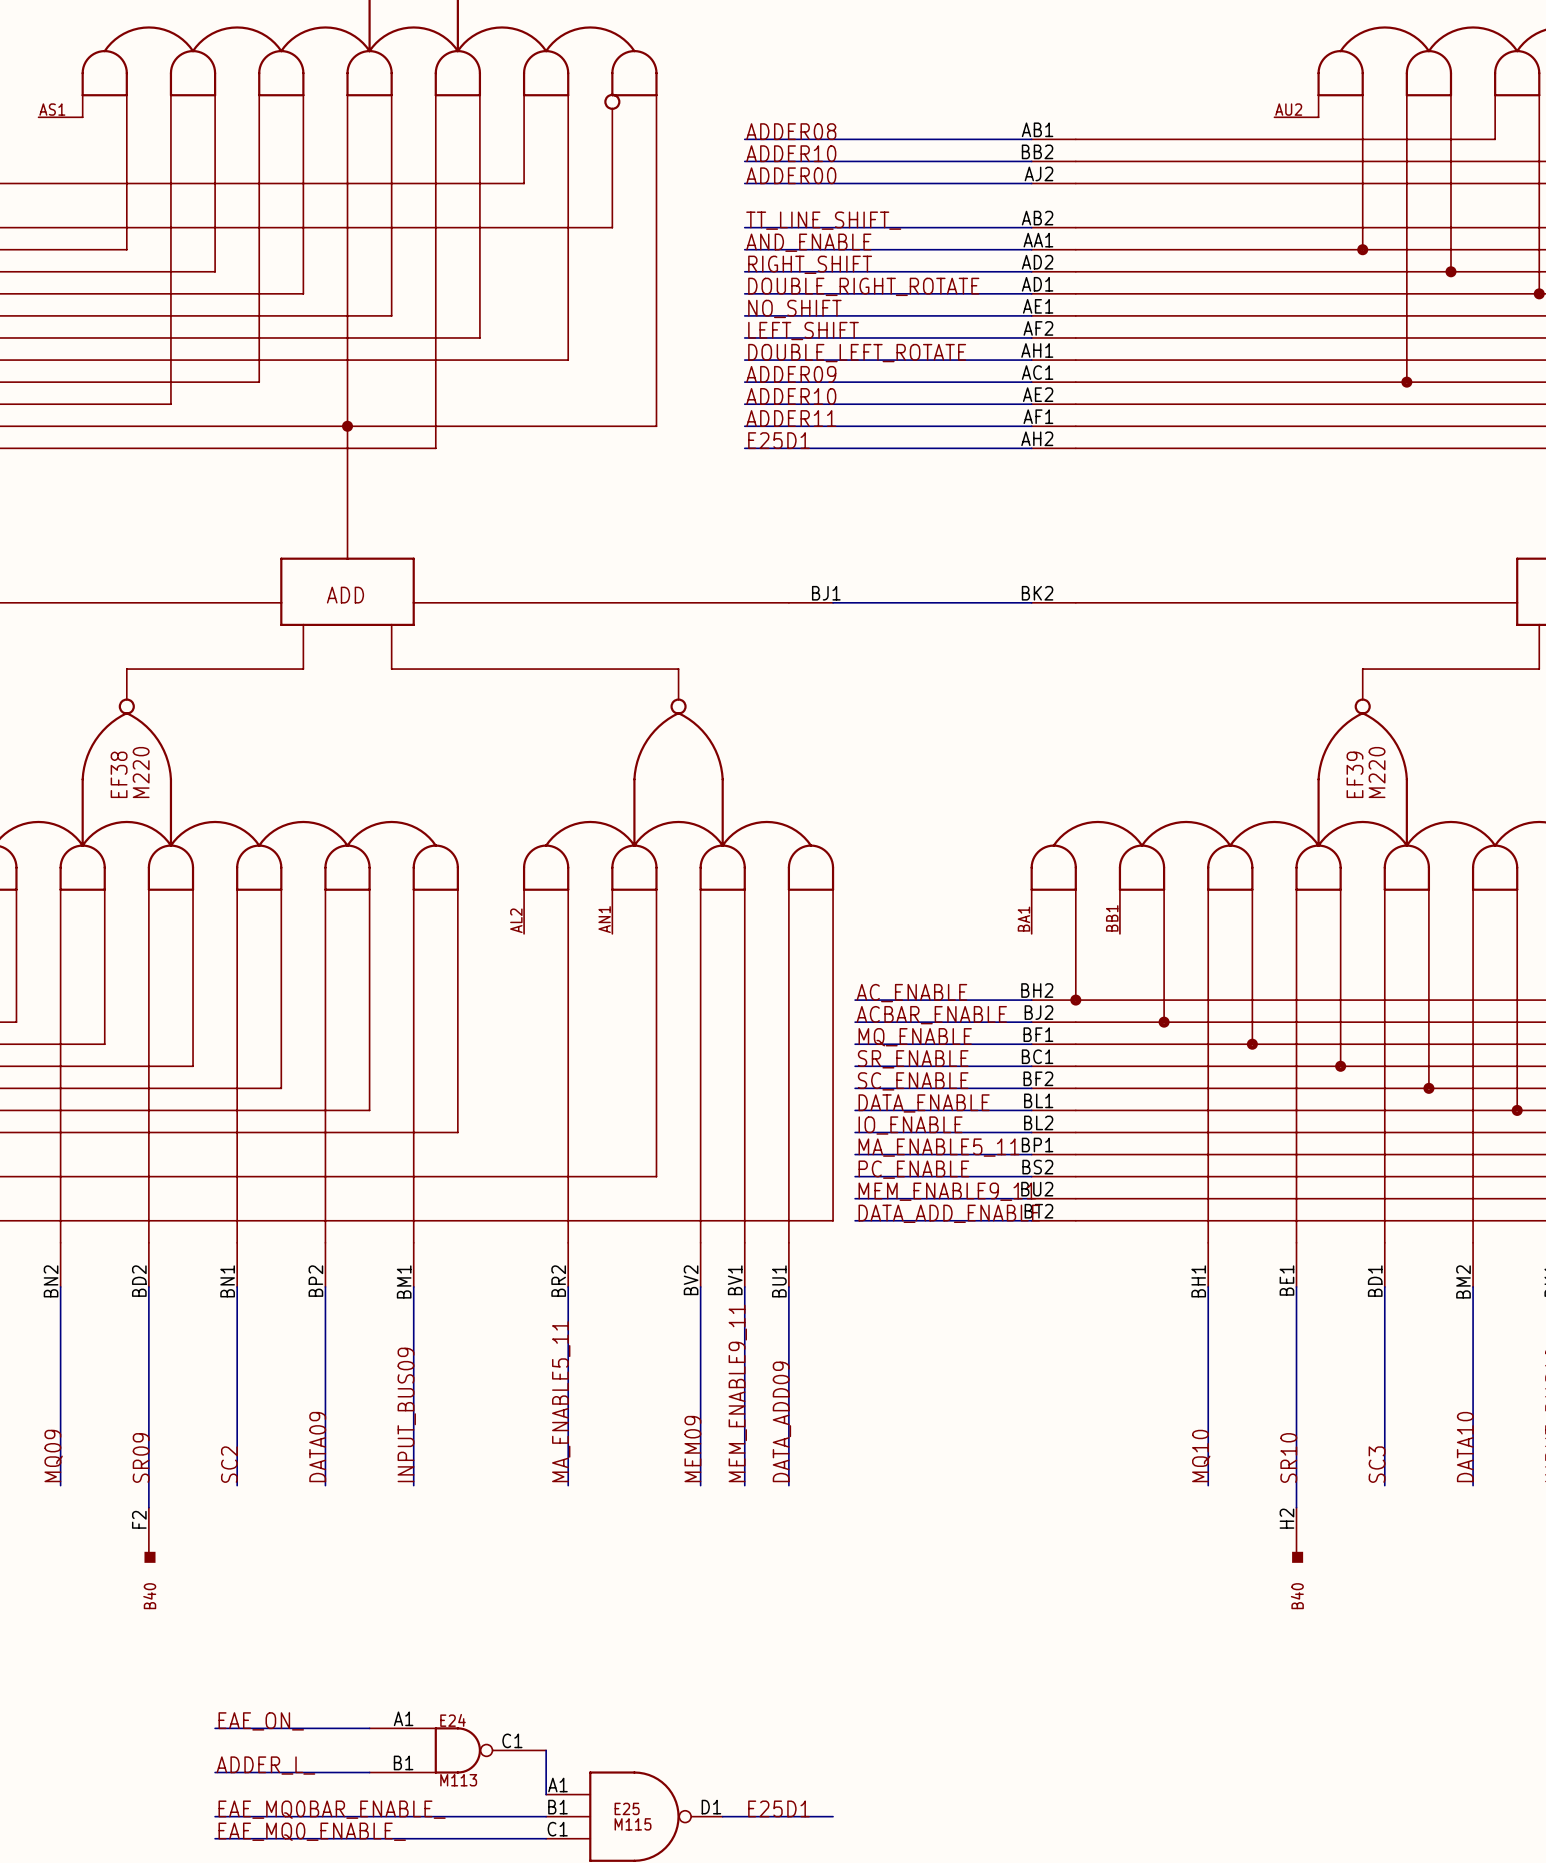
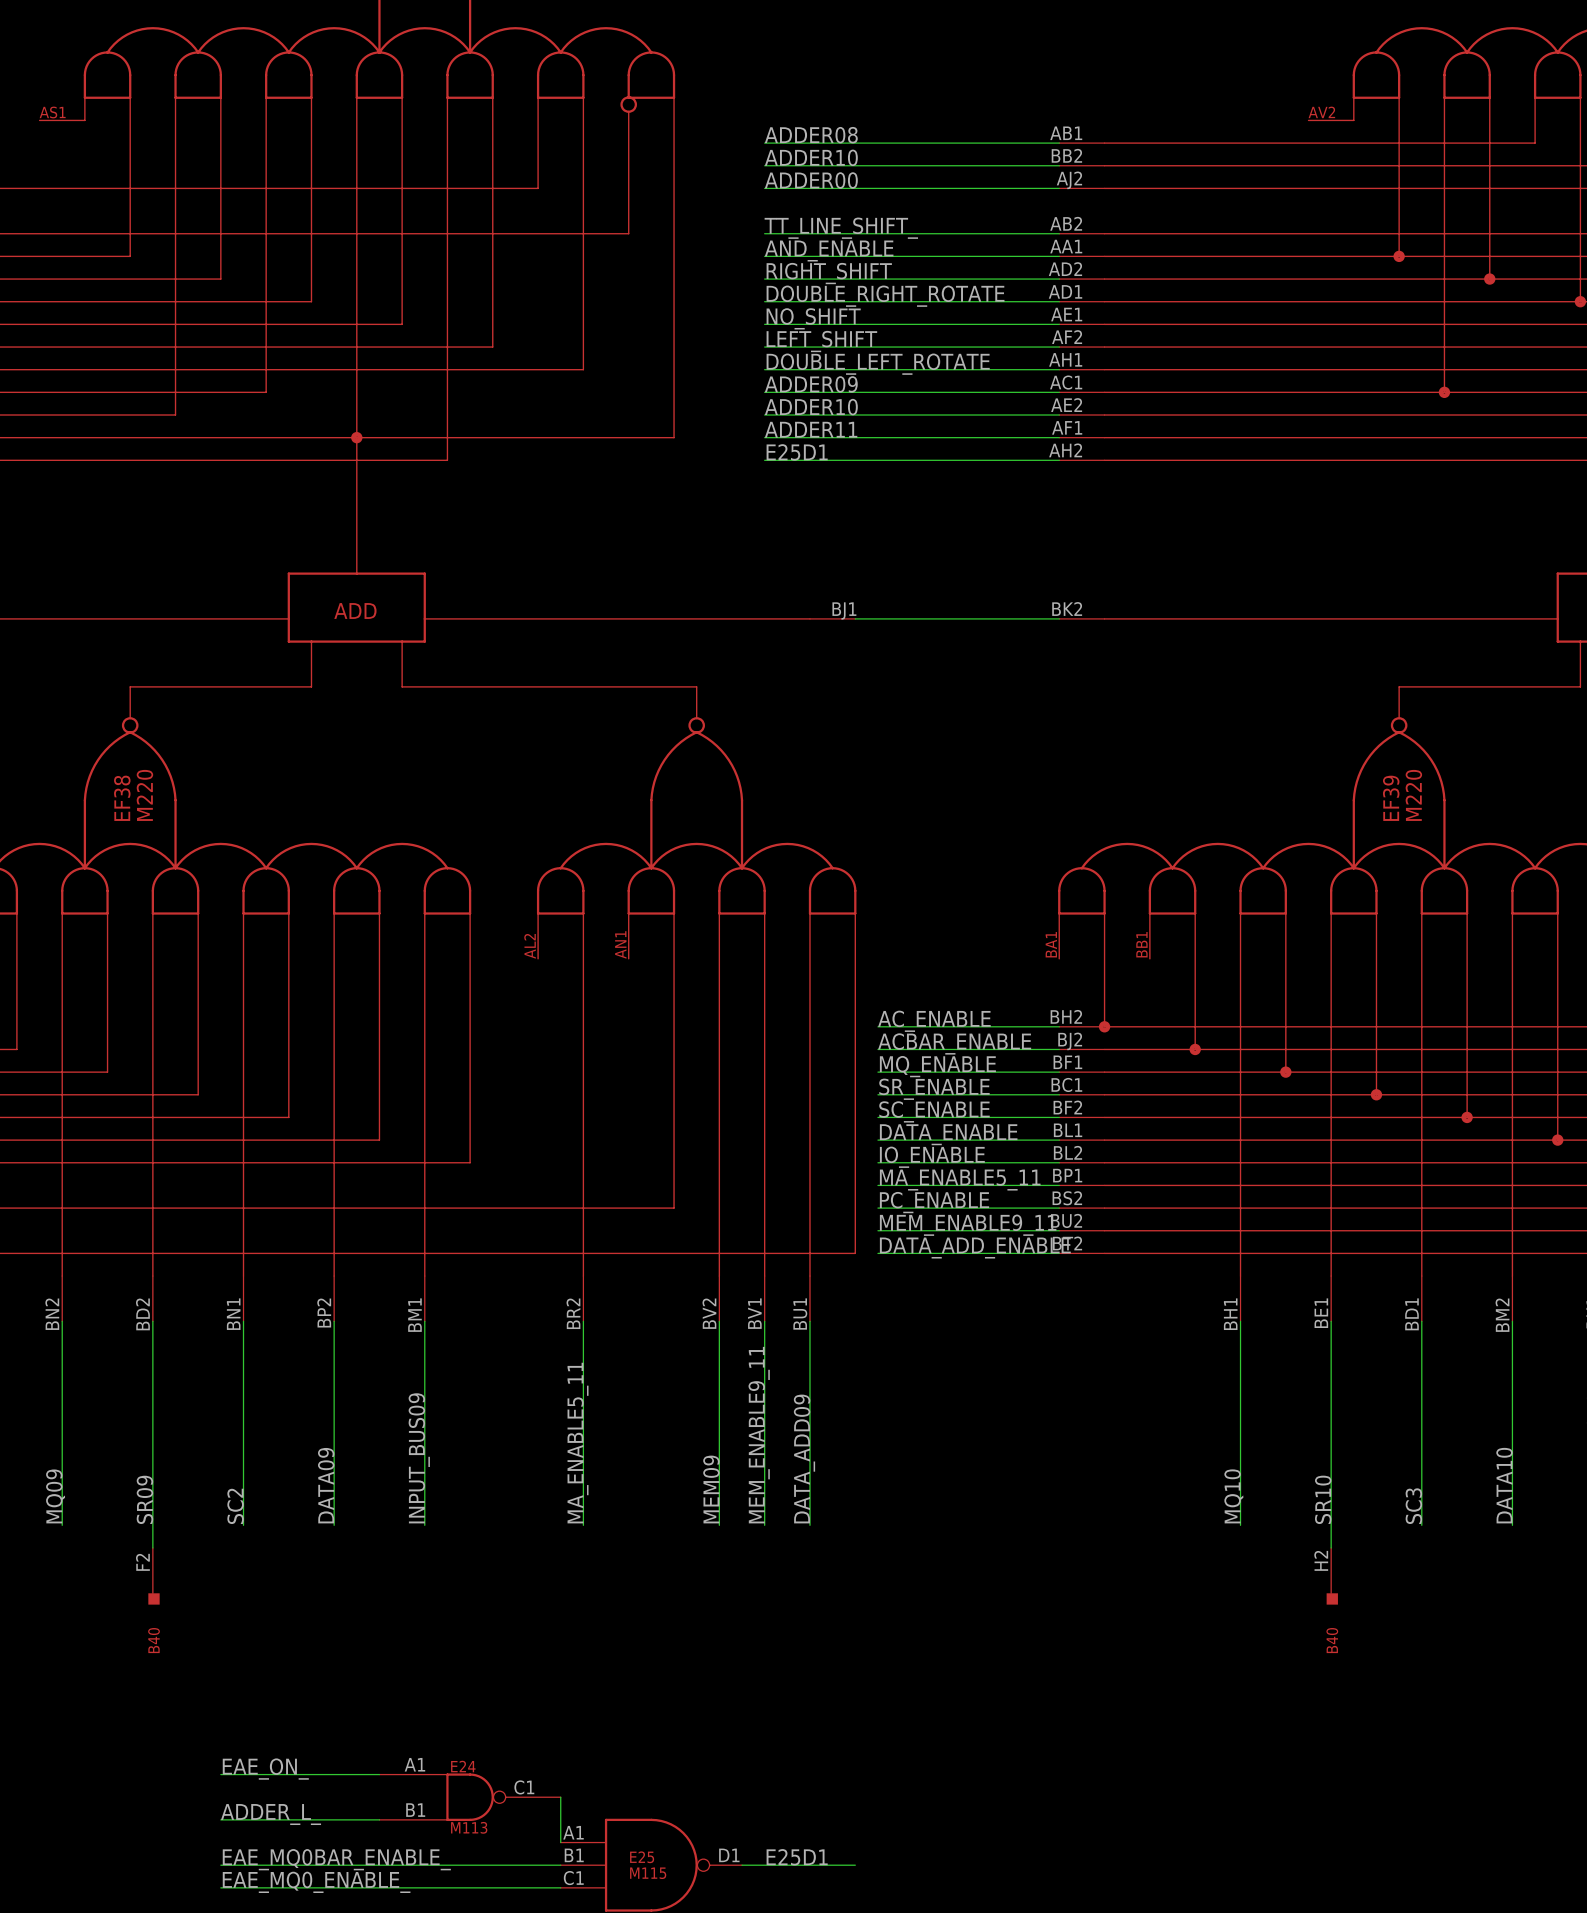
EF39 text: AU2 (1288, 109) -> AV2 (1321, 112)

